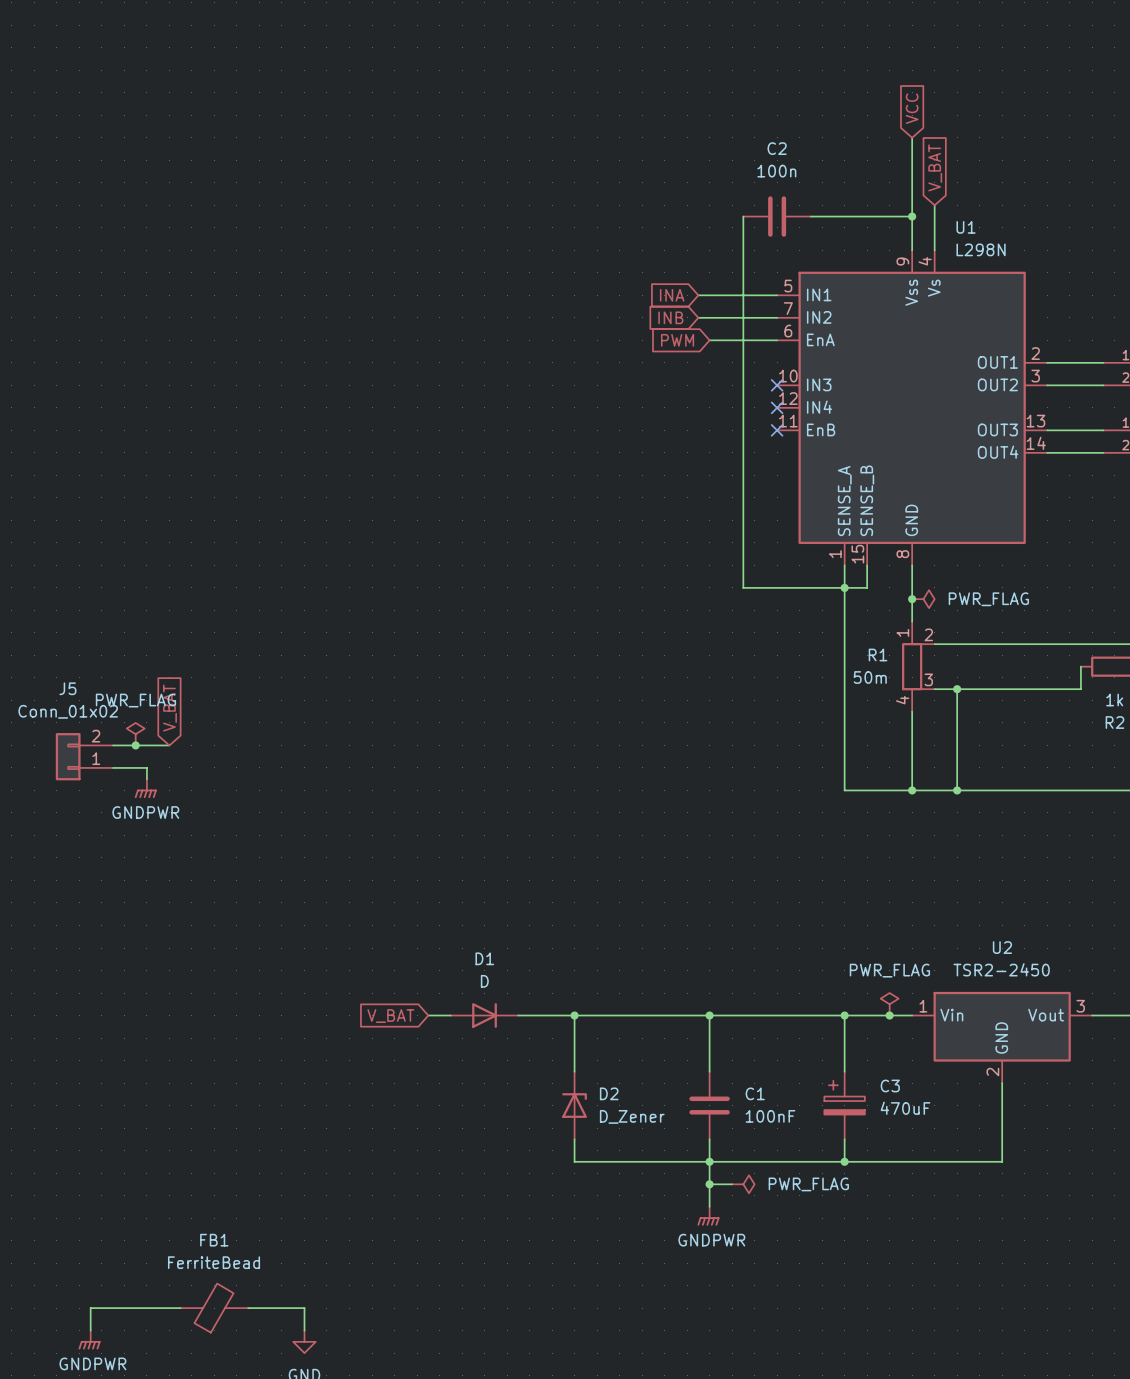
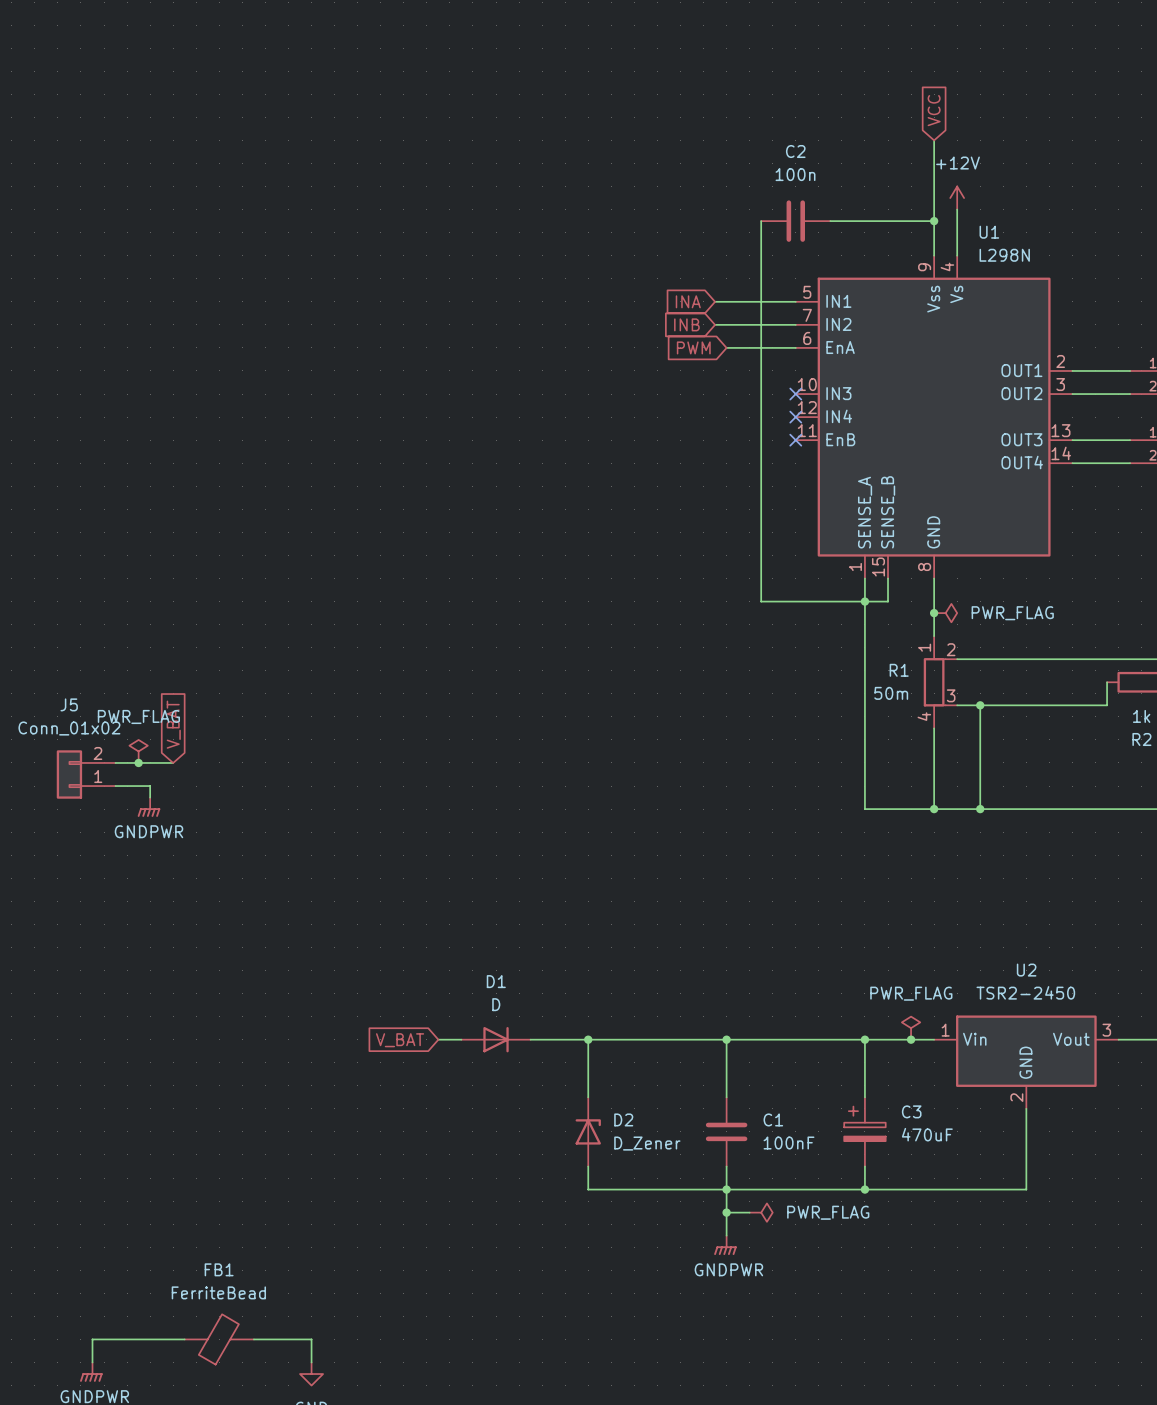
global label: V_BAT (935, 167) -> none
power symbol: none -> +12V (957, 198)

